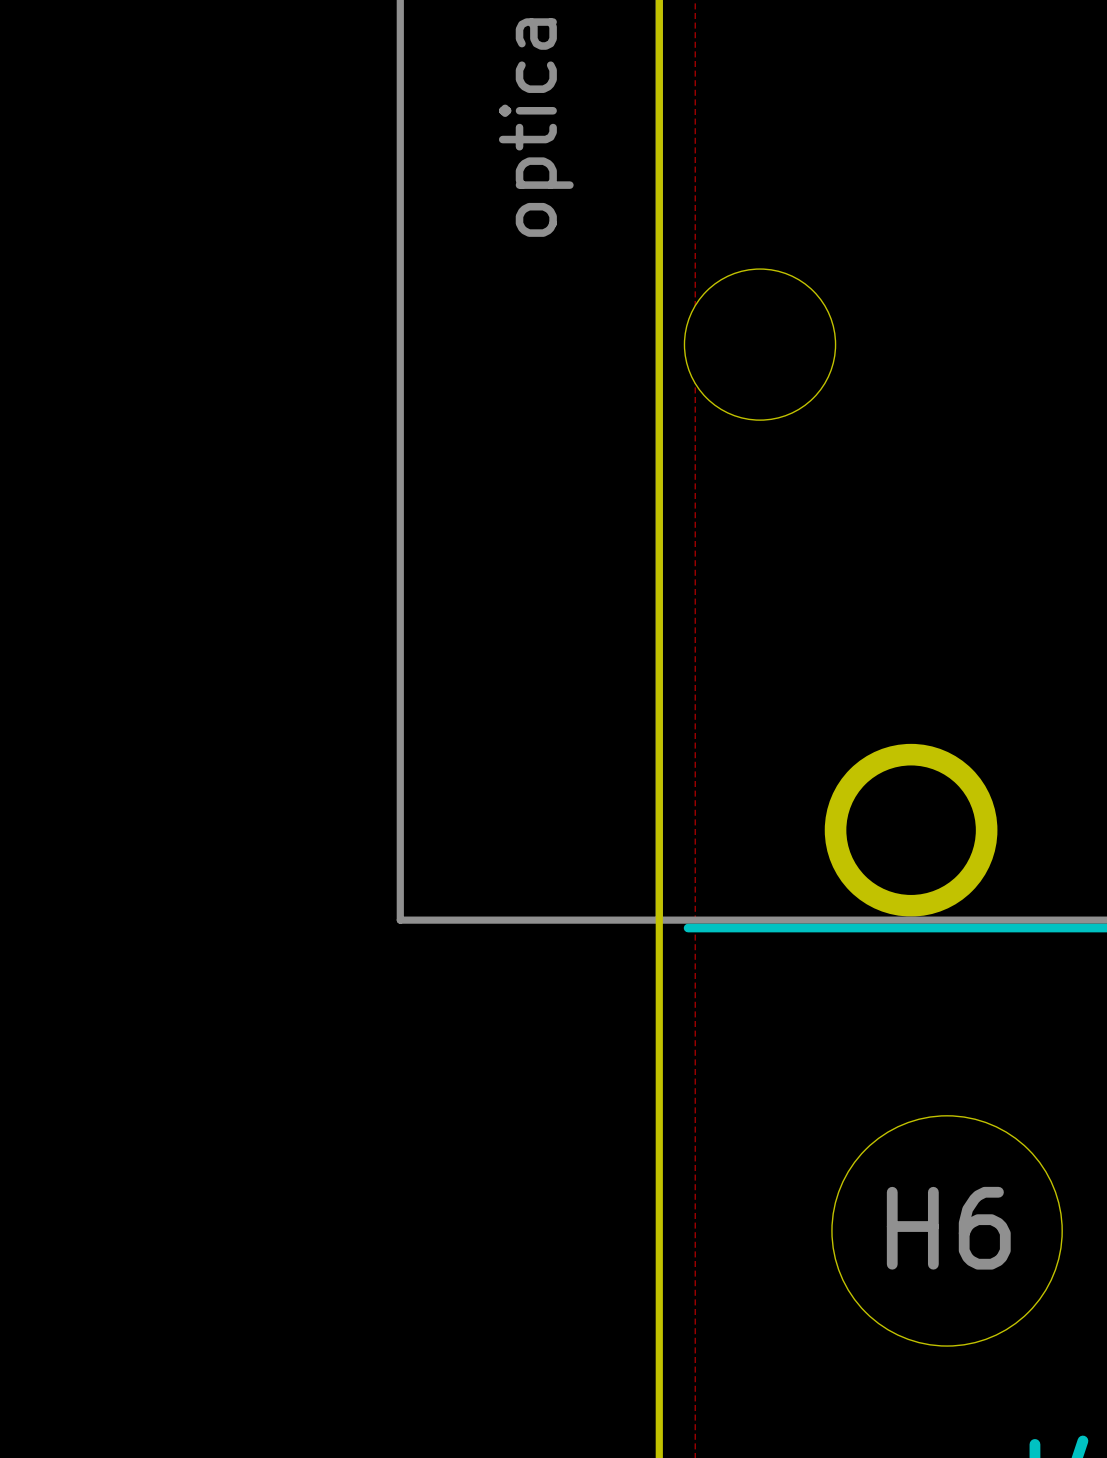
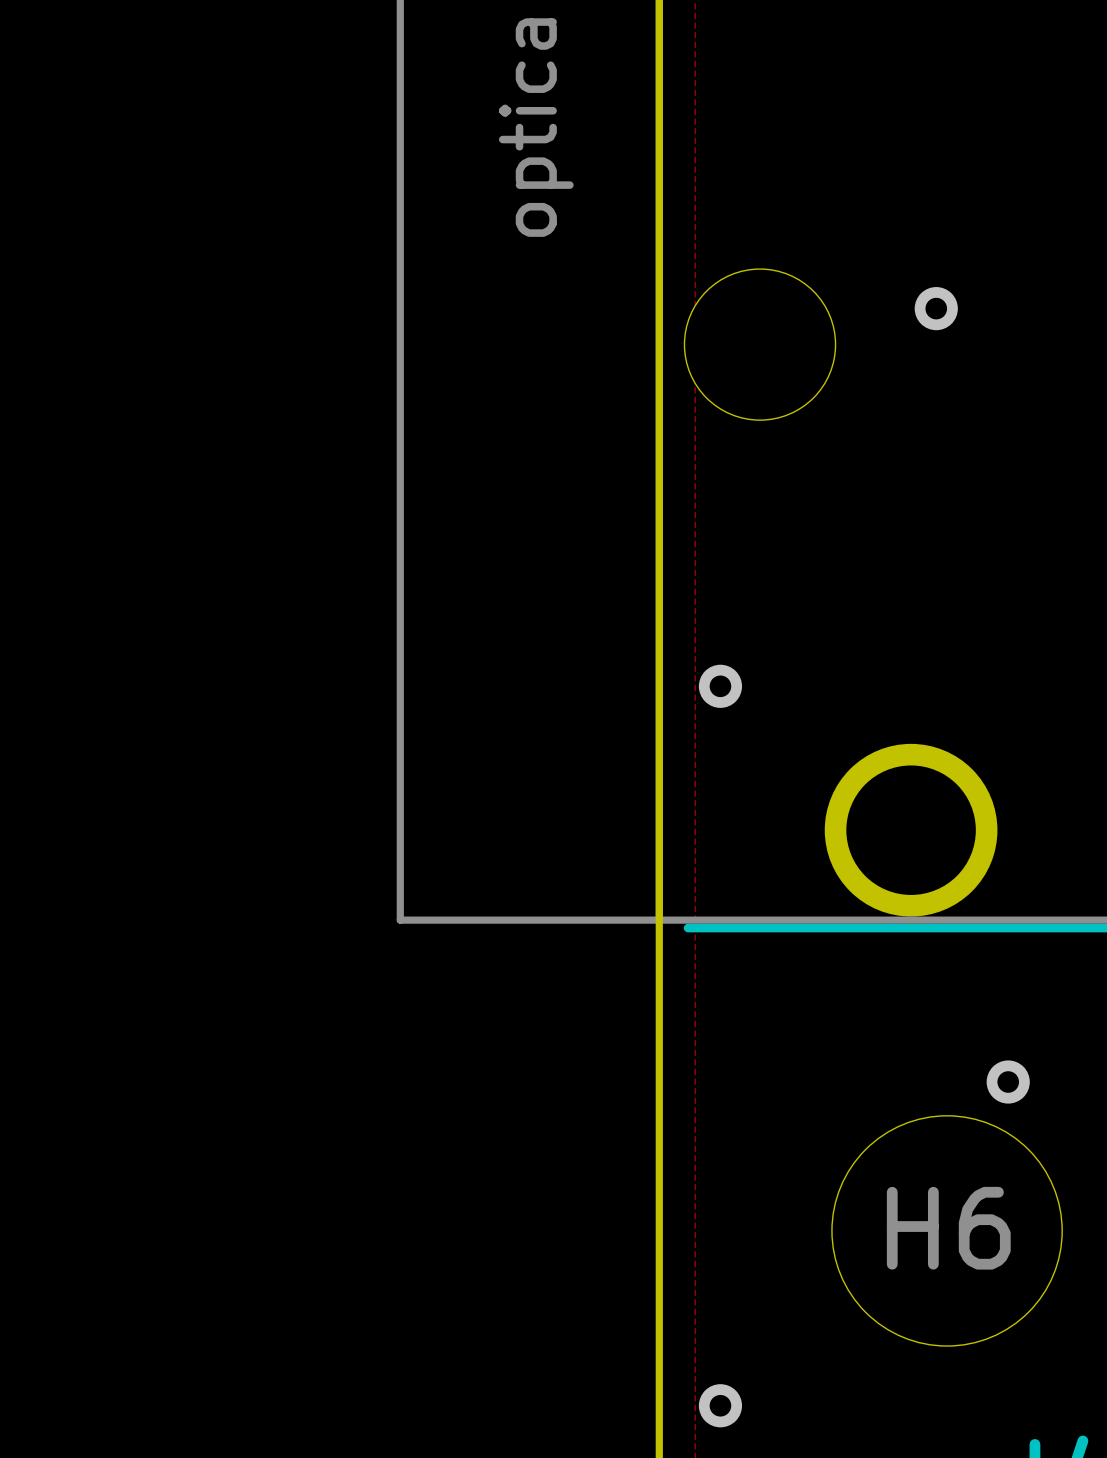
via: none -> (936, 308)
via: none -> (720, 686)
via: none -> (1008, 1082)
via: none -> (720, 1405)

